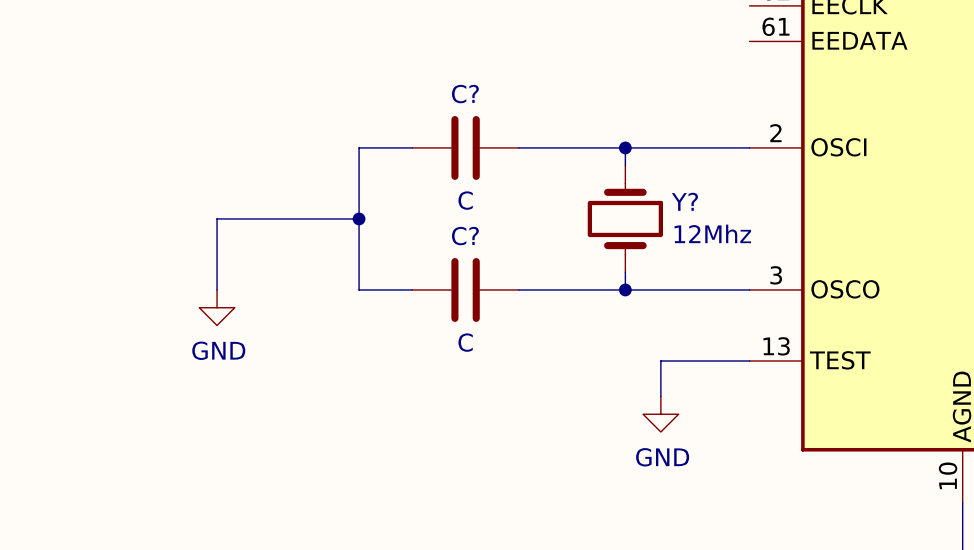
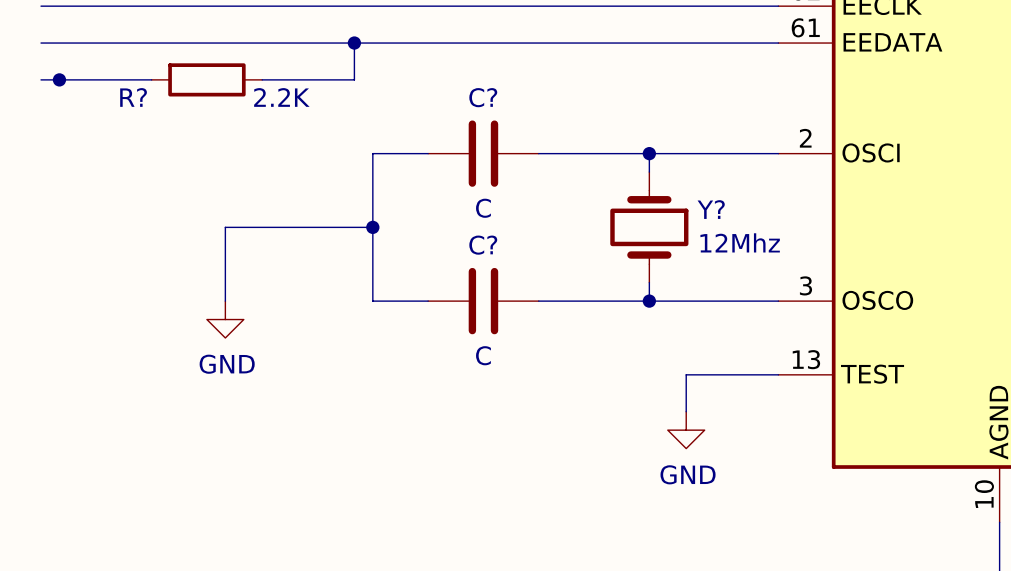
wire: none -> (41, 6) (778, 6)
wire: none -> (41, 43) (778, 43)
wire: none -> (354, 43) (354, 79) (262, 79)
junction: none -> (354, 43)
wire: none -> (41, 79) (151, 79)
junction: none -> (59, 79)
R?: none -> 2.2K (206, 79)

